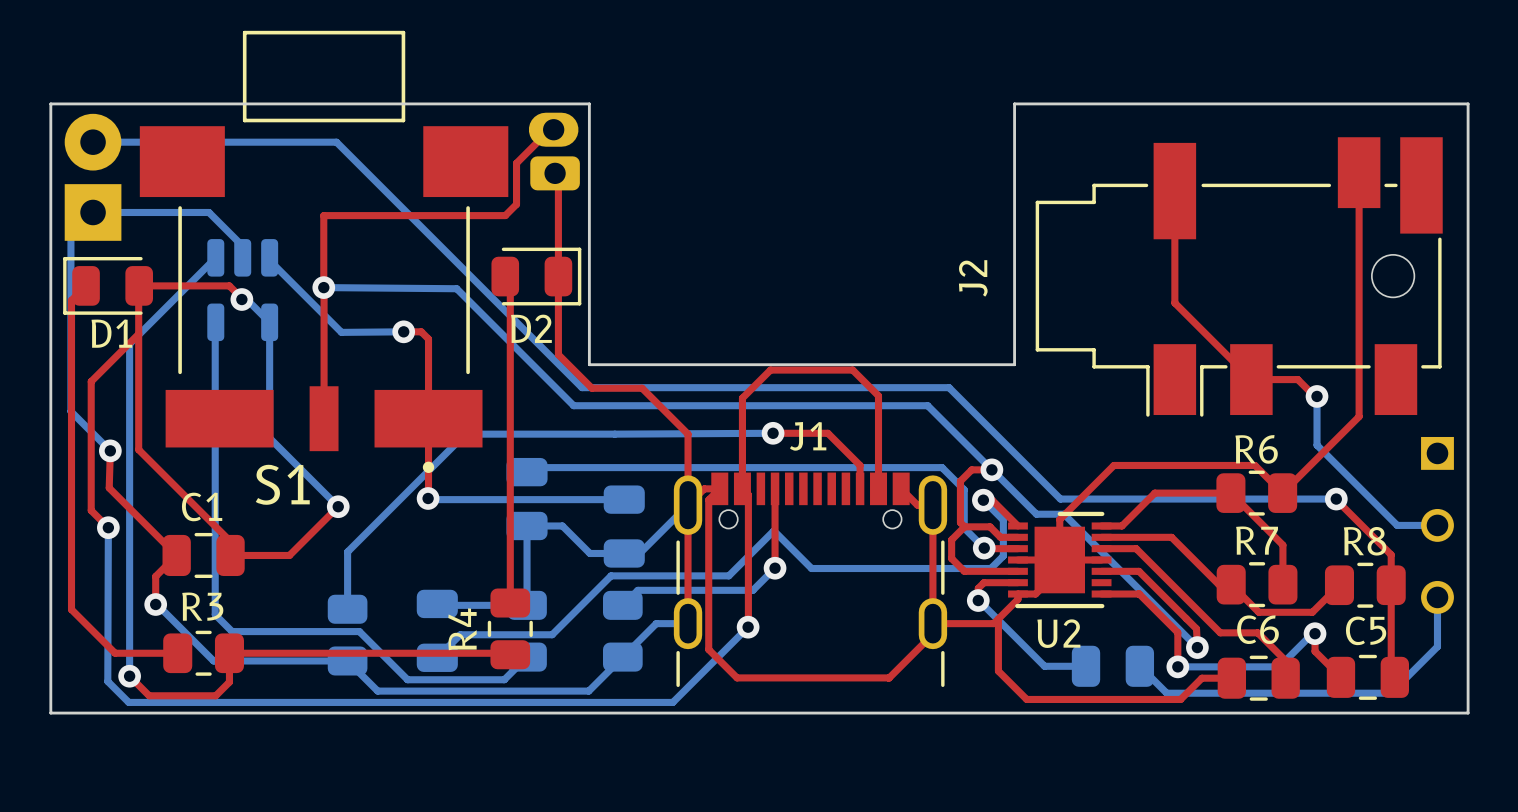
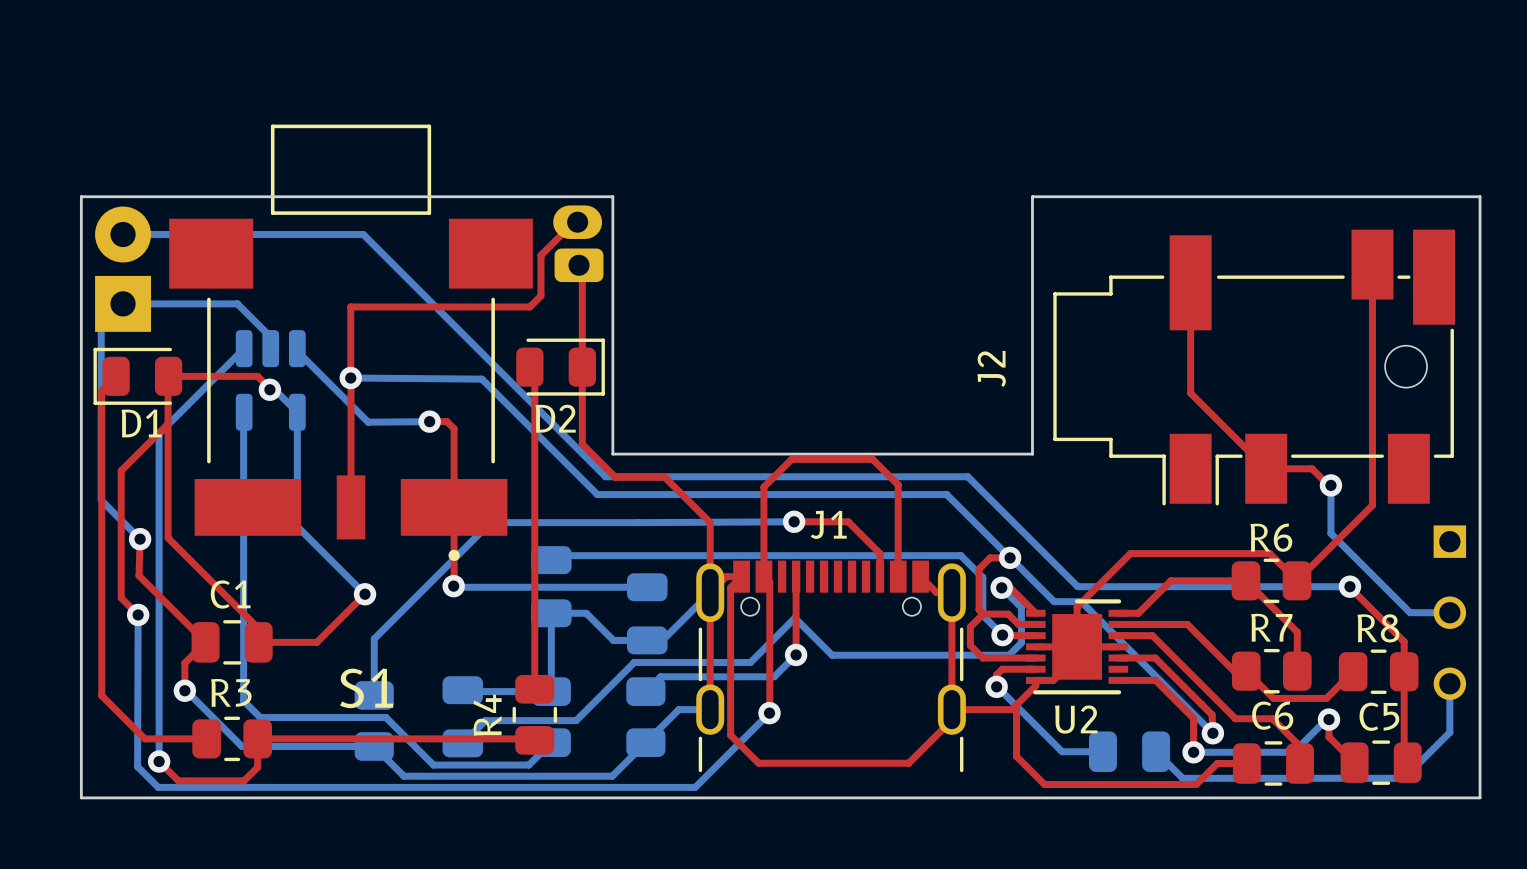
S1 name position: S1 (282, 484) -> S1 (366, 688)

